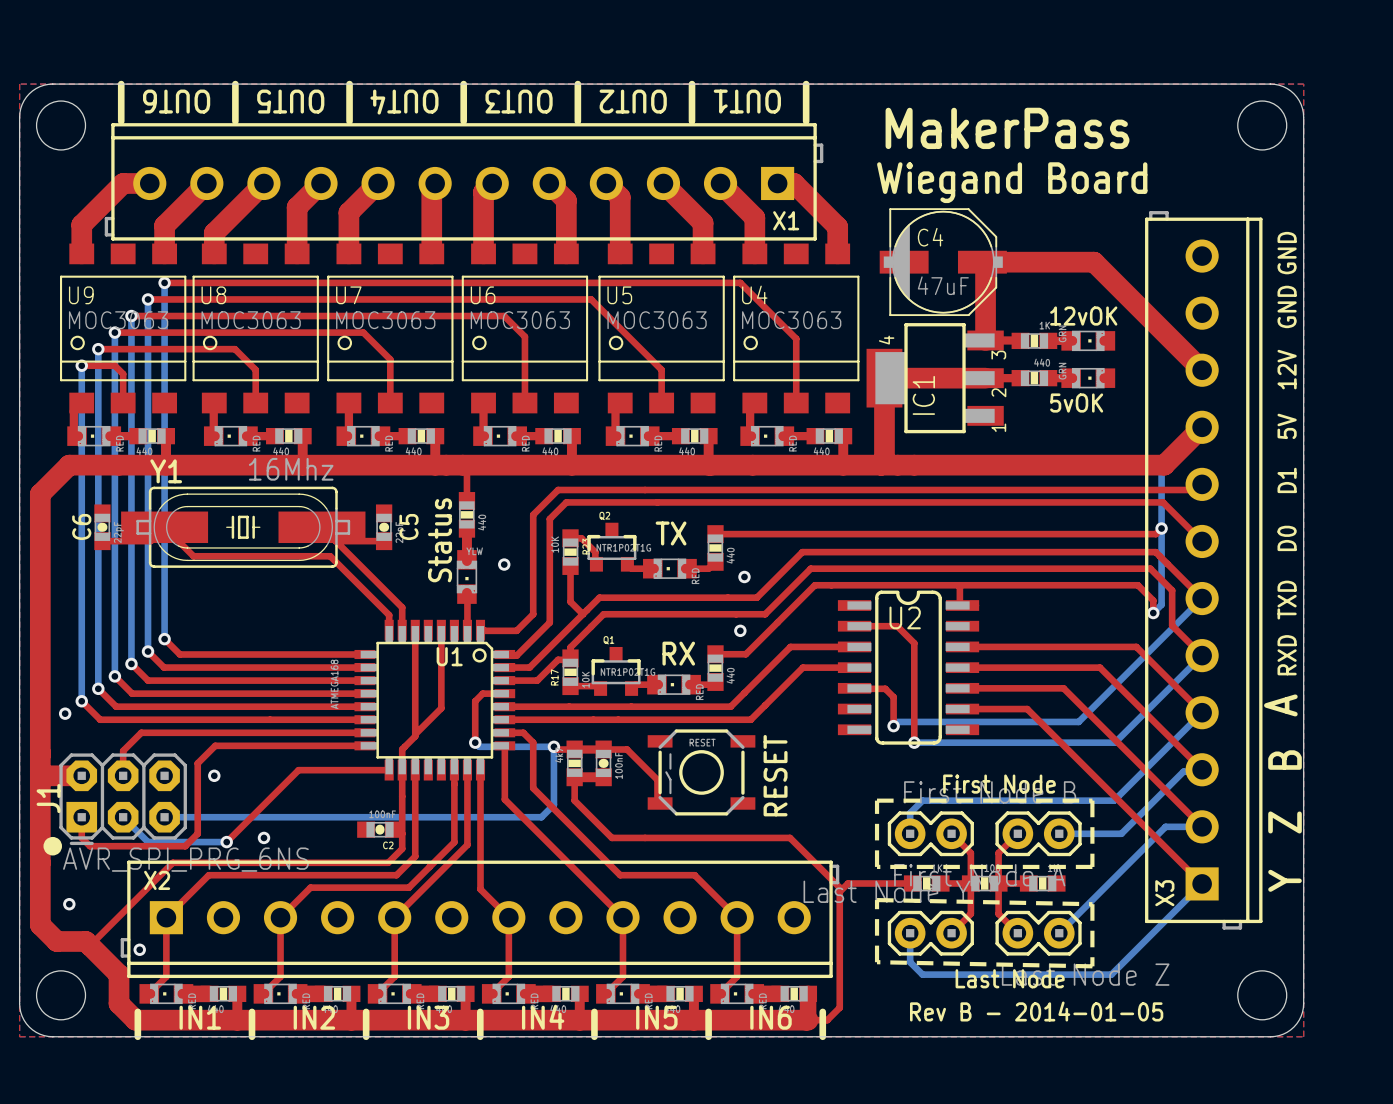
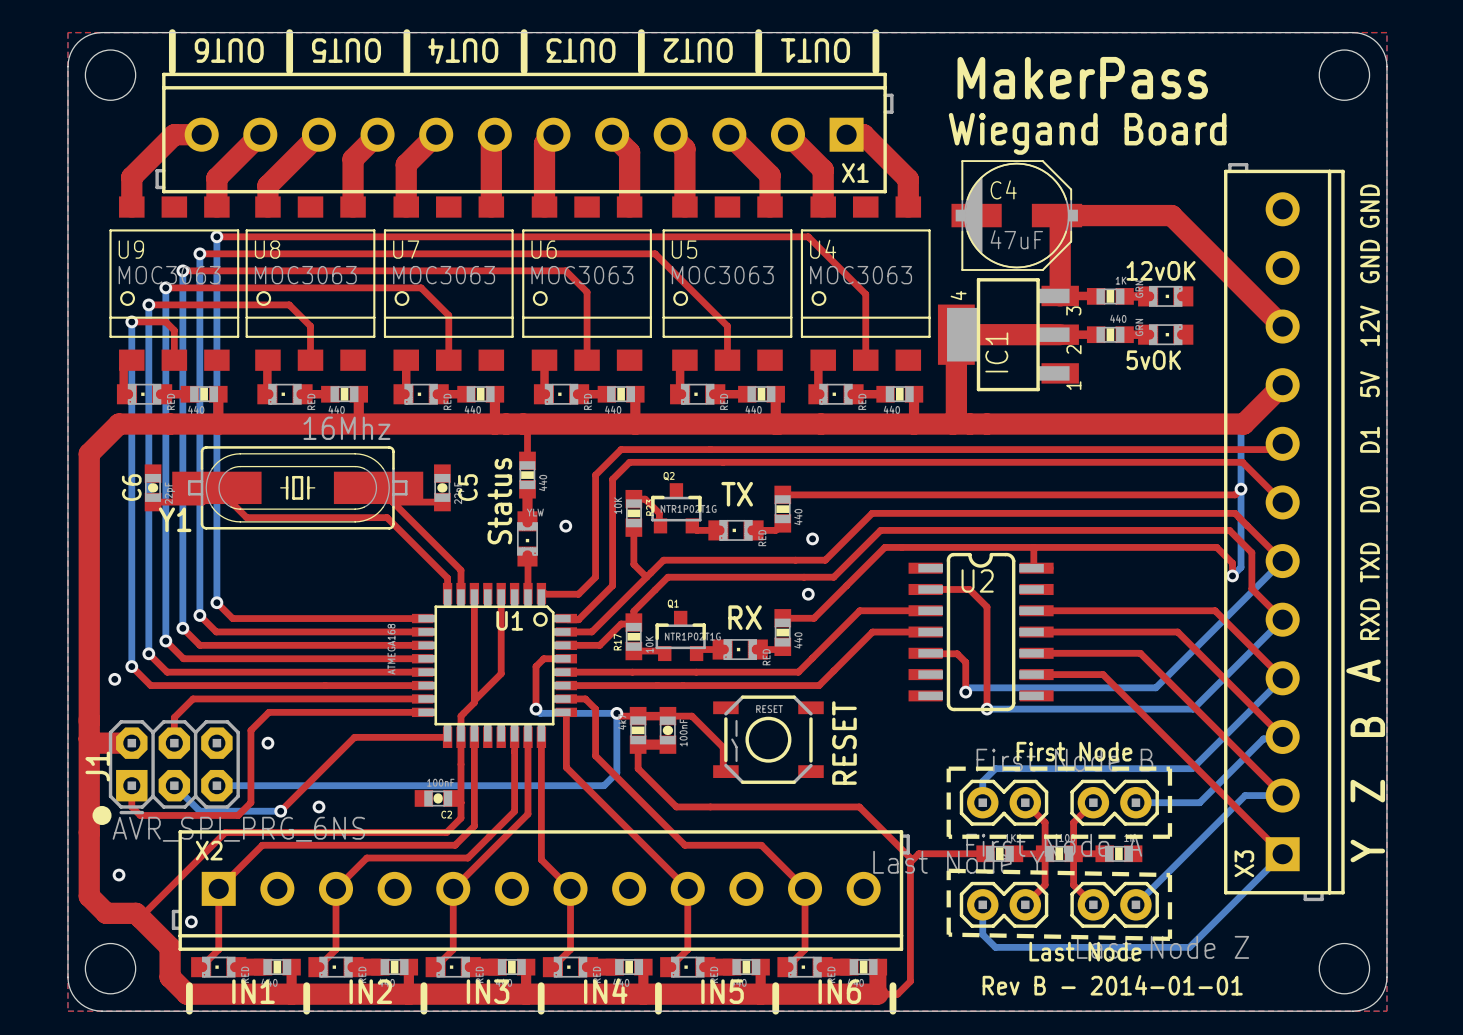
Y1 name position: Y1 (166, 471) -> Y1 (175, 519)
text: Rev B - 2014-01-05 (1036, 1011) -> Rev B - 2014-01-01 (1112, 985)

